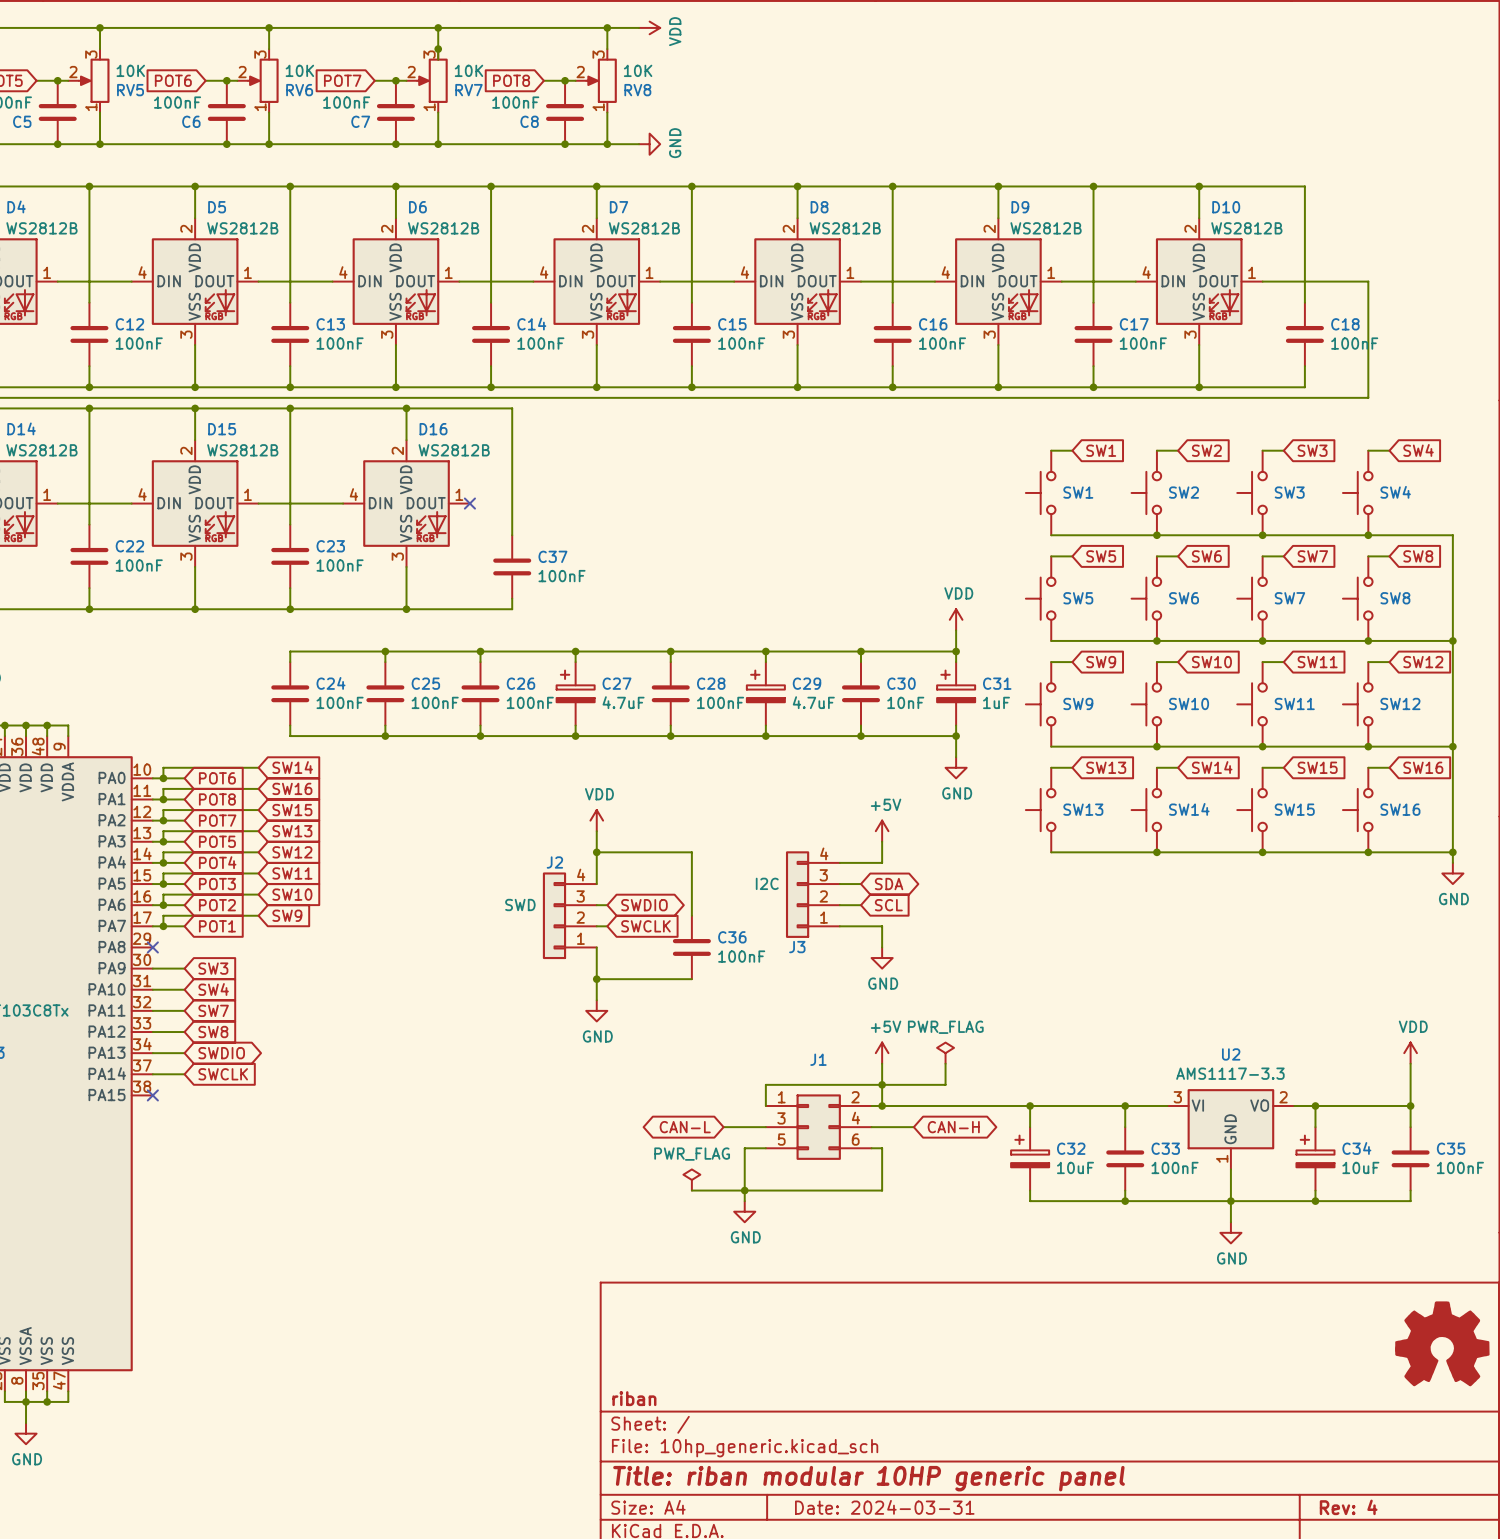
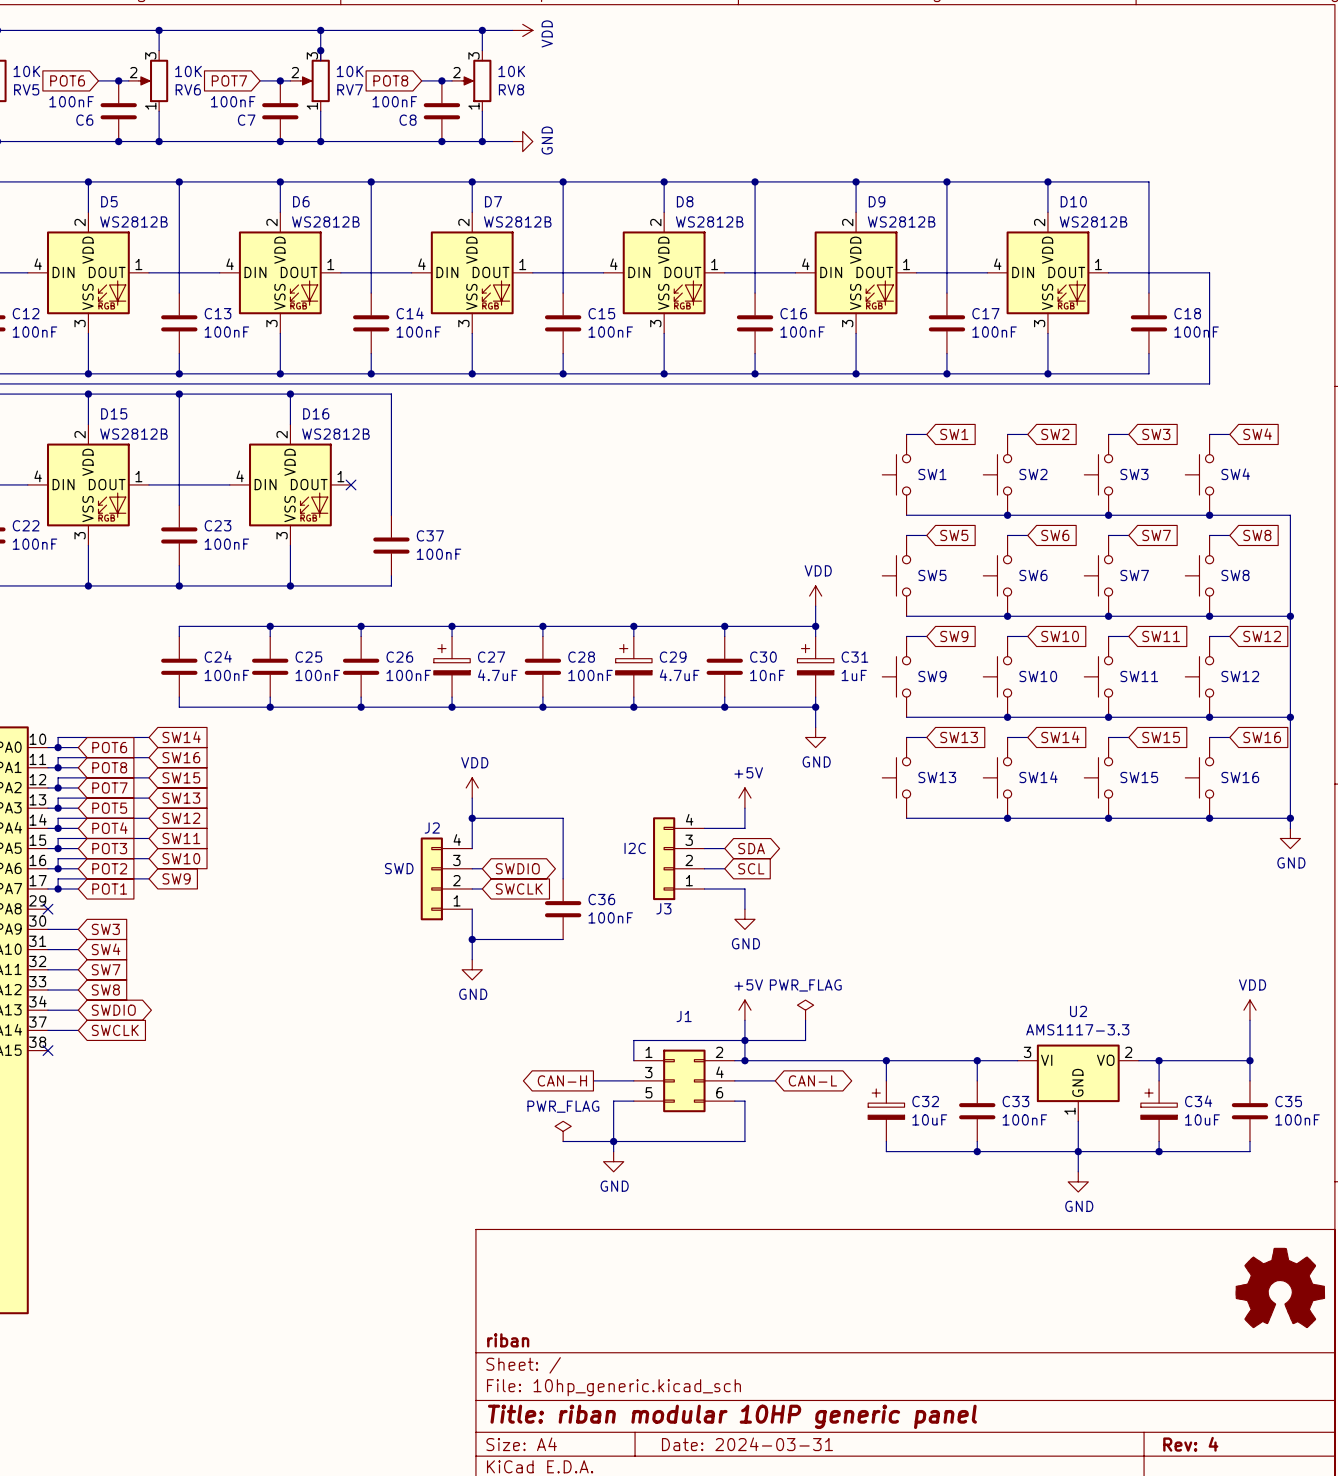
global label shape: bidirectional (685, 1127) -> output (562, 1080)
global label: CAN-L (685, 1127) -> CAN-H (562, 1080)
global label: CAN-H (953, 1127) -> CAN-L (812, 1080)

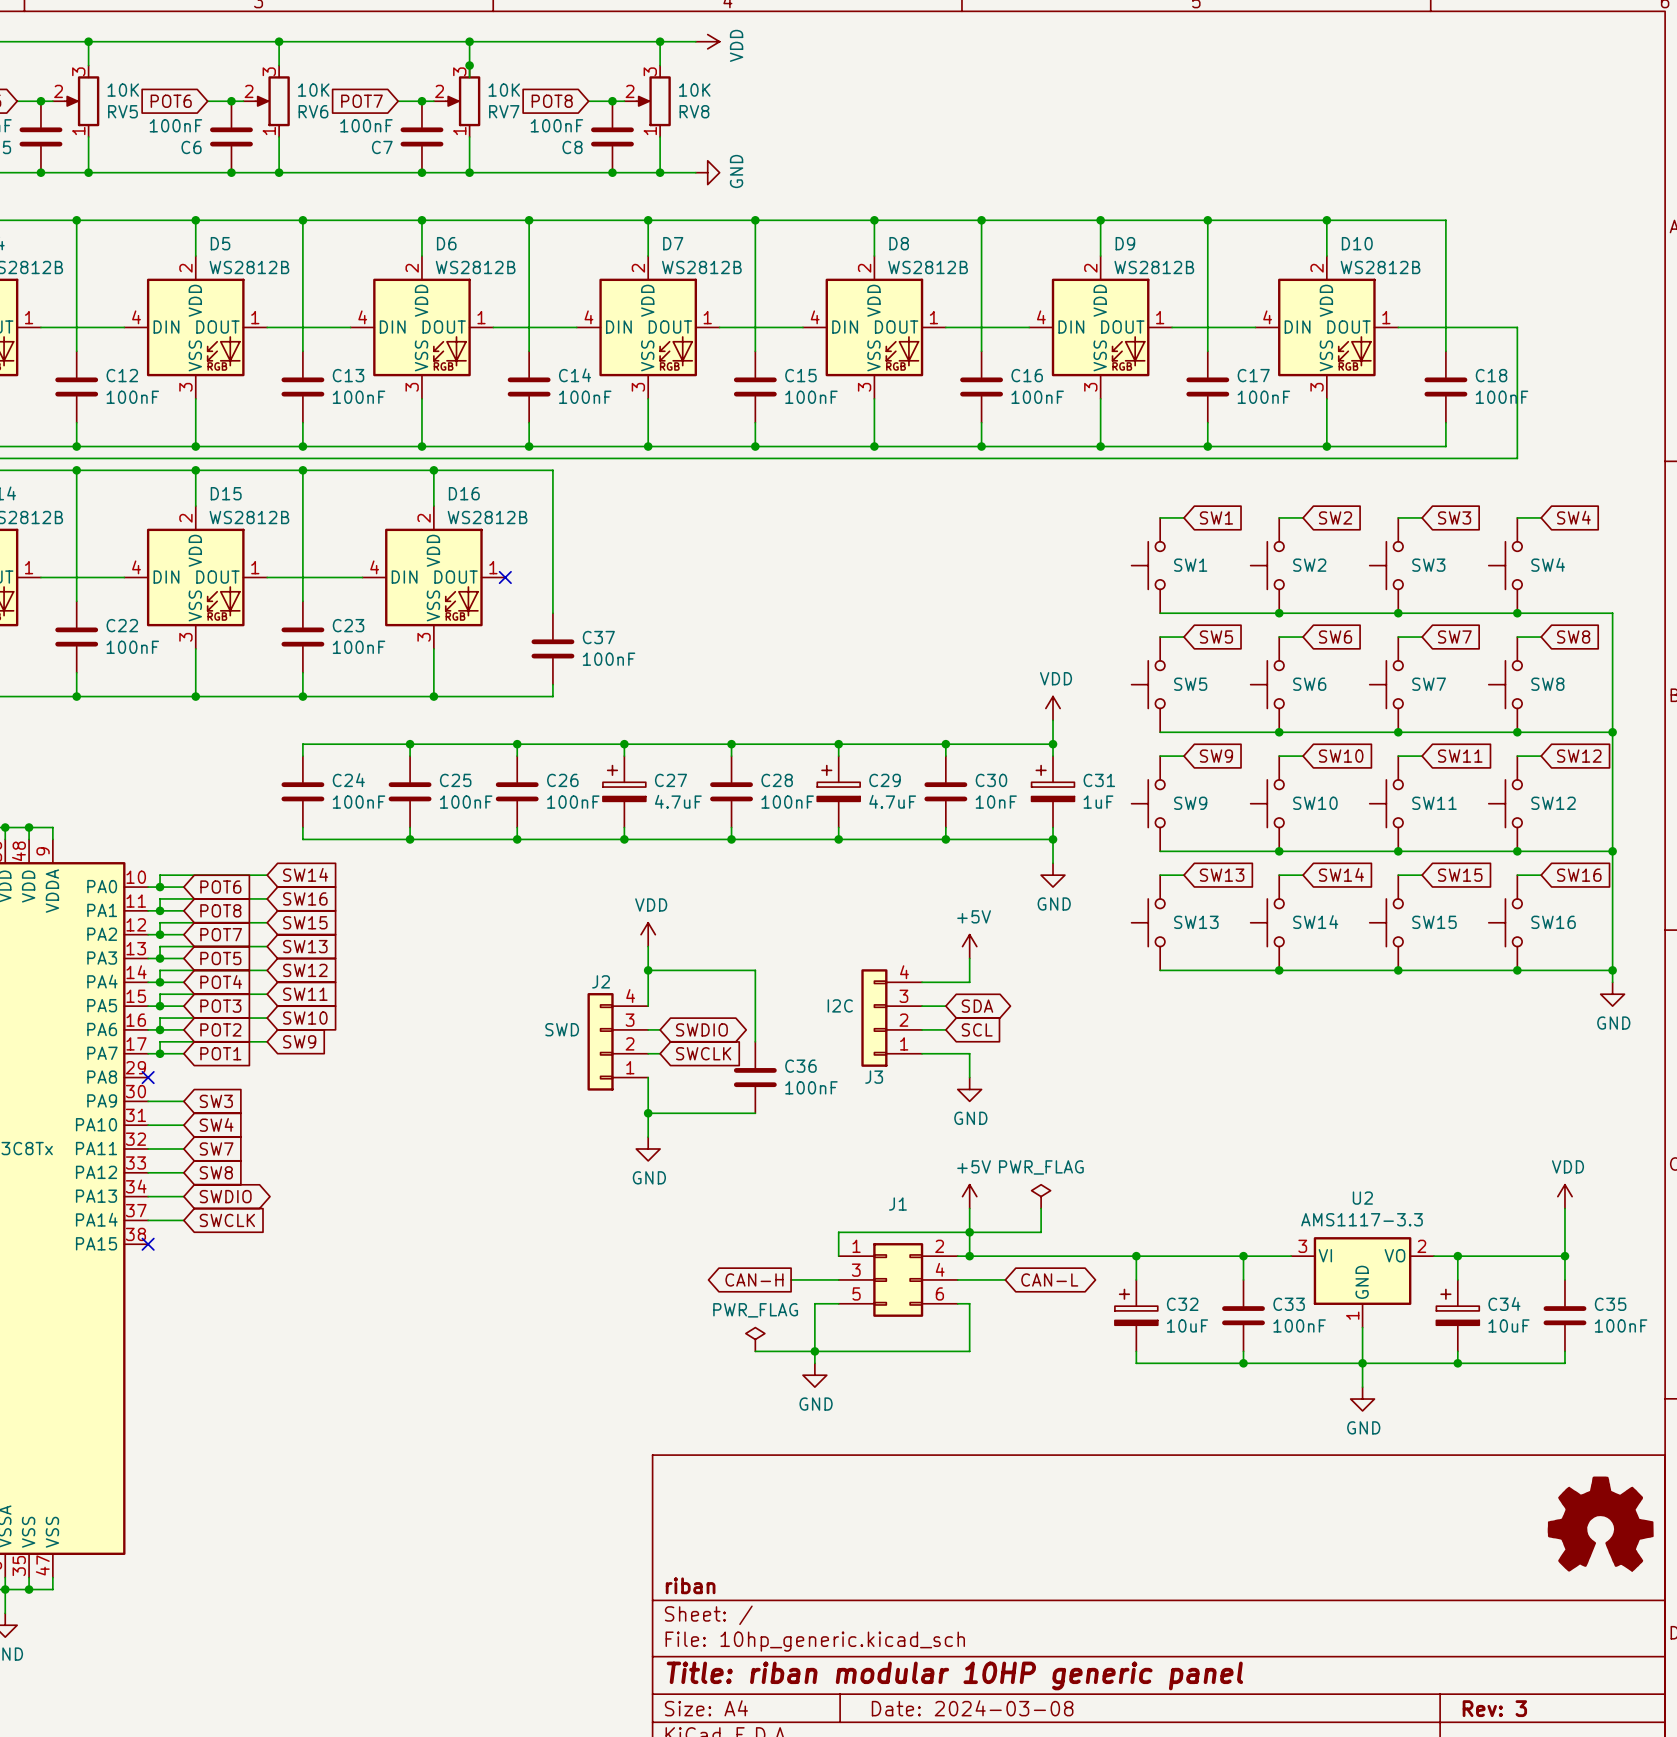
title block: Date: 2024-03-31 (747, 1444) -> Date: 2024-03-08 (972, 1708)
title block: Rev: 4 (1190, 1444) -> Rev: 3 (1494, 1708)

